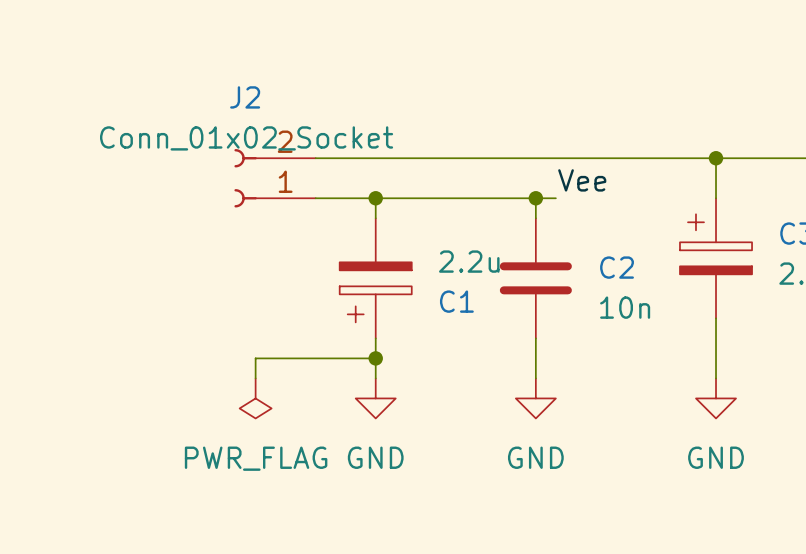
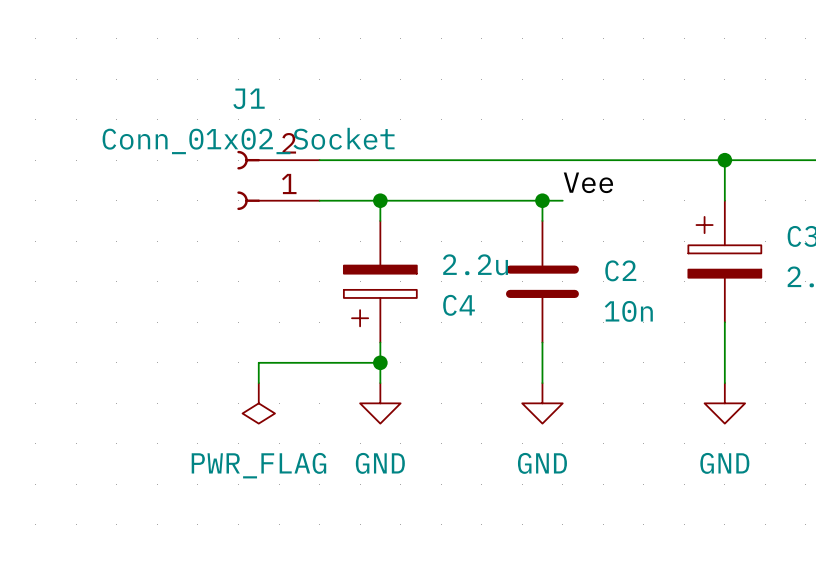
J2 name: J2 (245, 97) -> J1 (249, 98)
C1 name: C1 (456, 301) -> C4 (459, 305)

